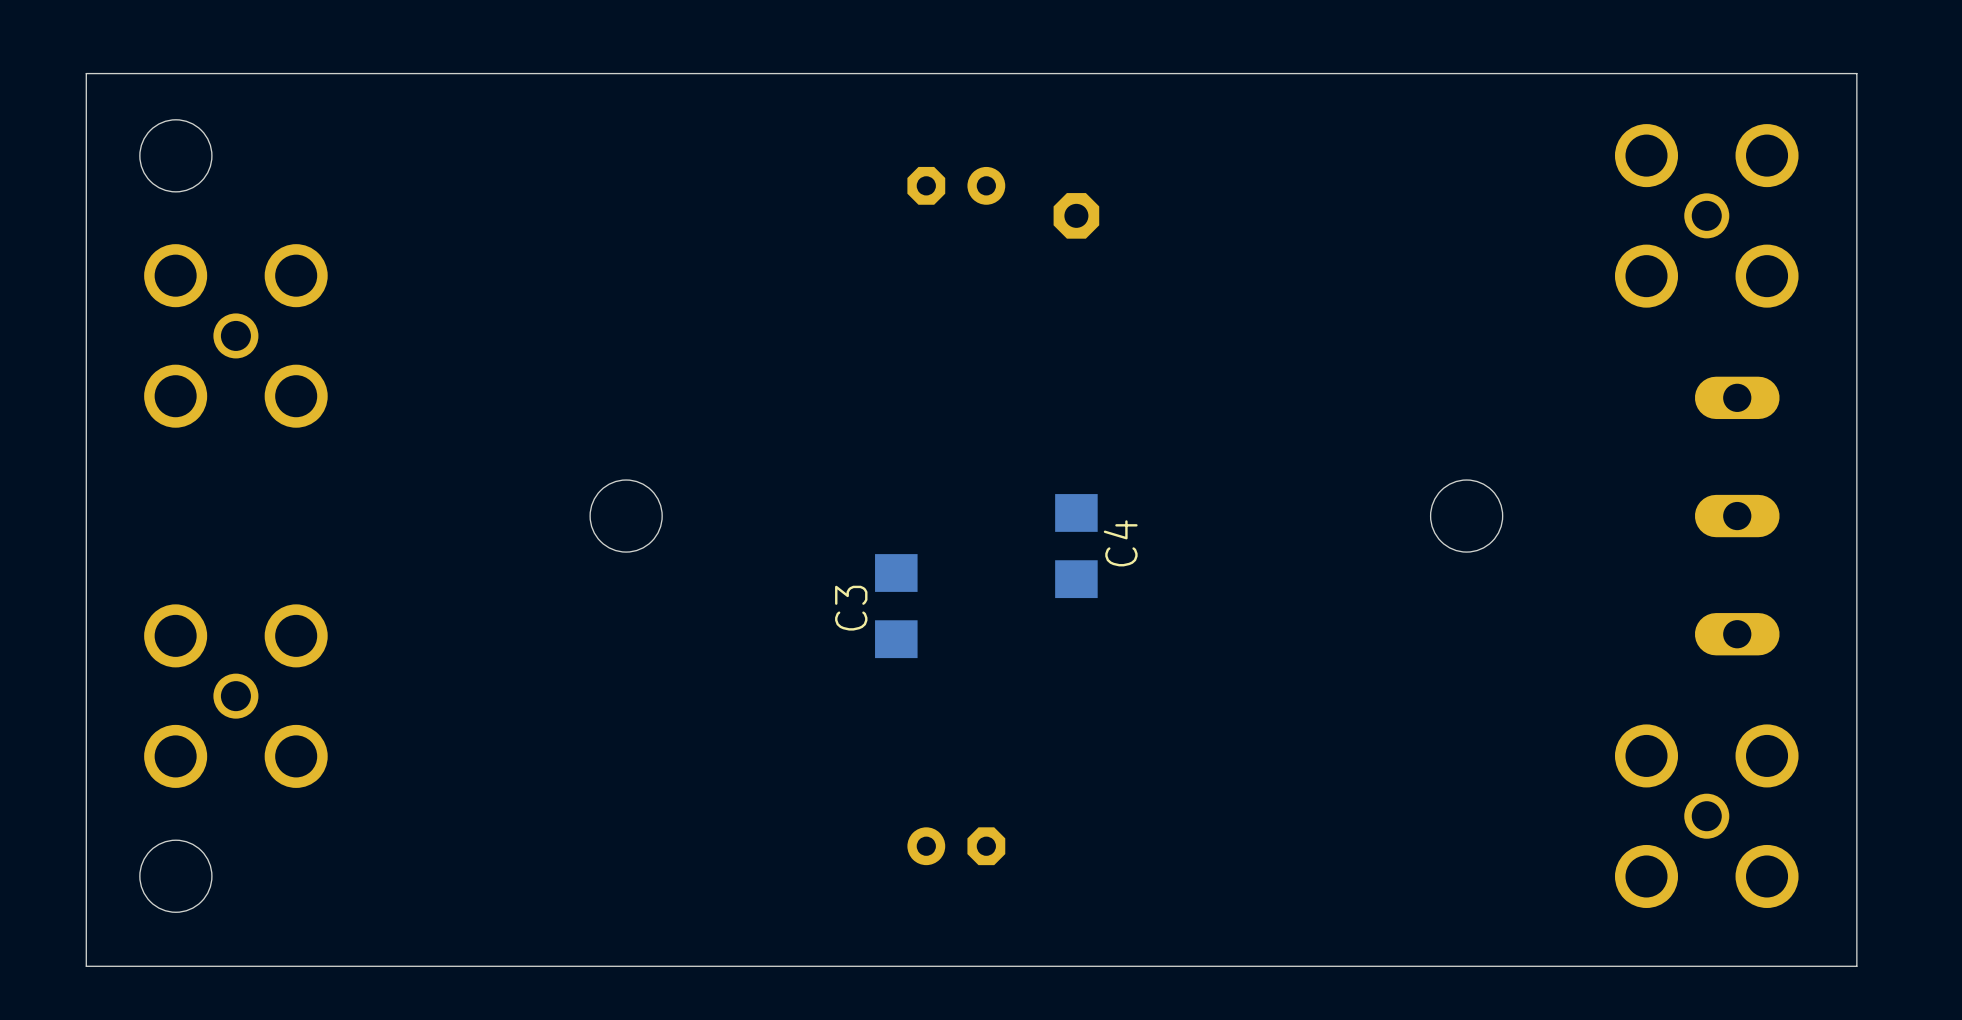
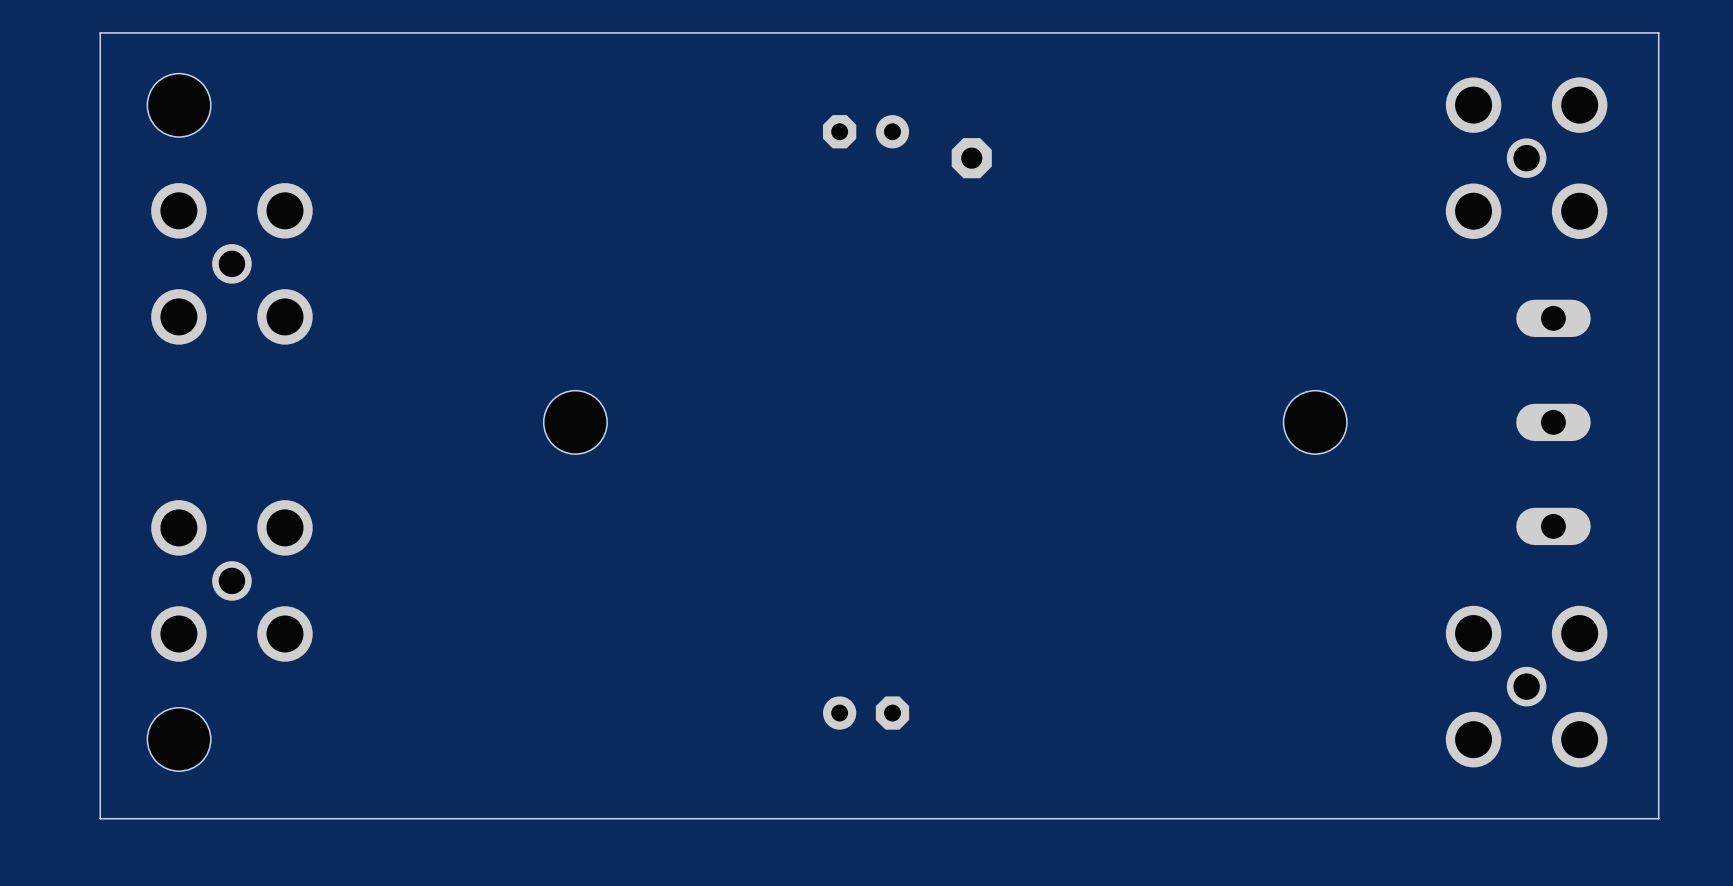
C4: (1076, 546) -> none
C3: (896, 606) -> none

